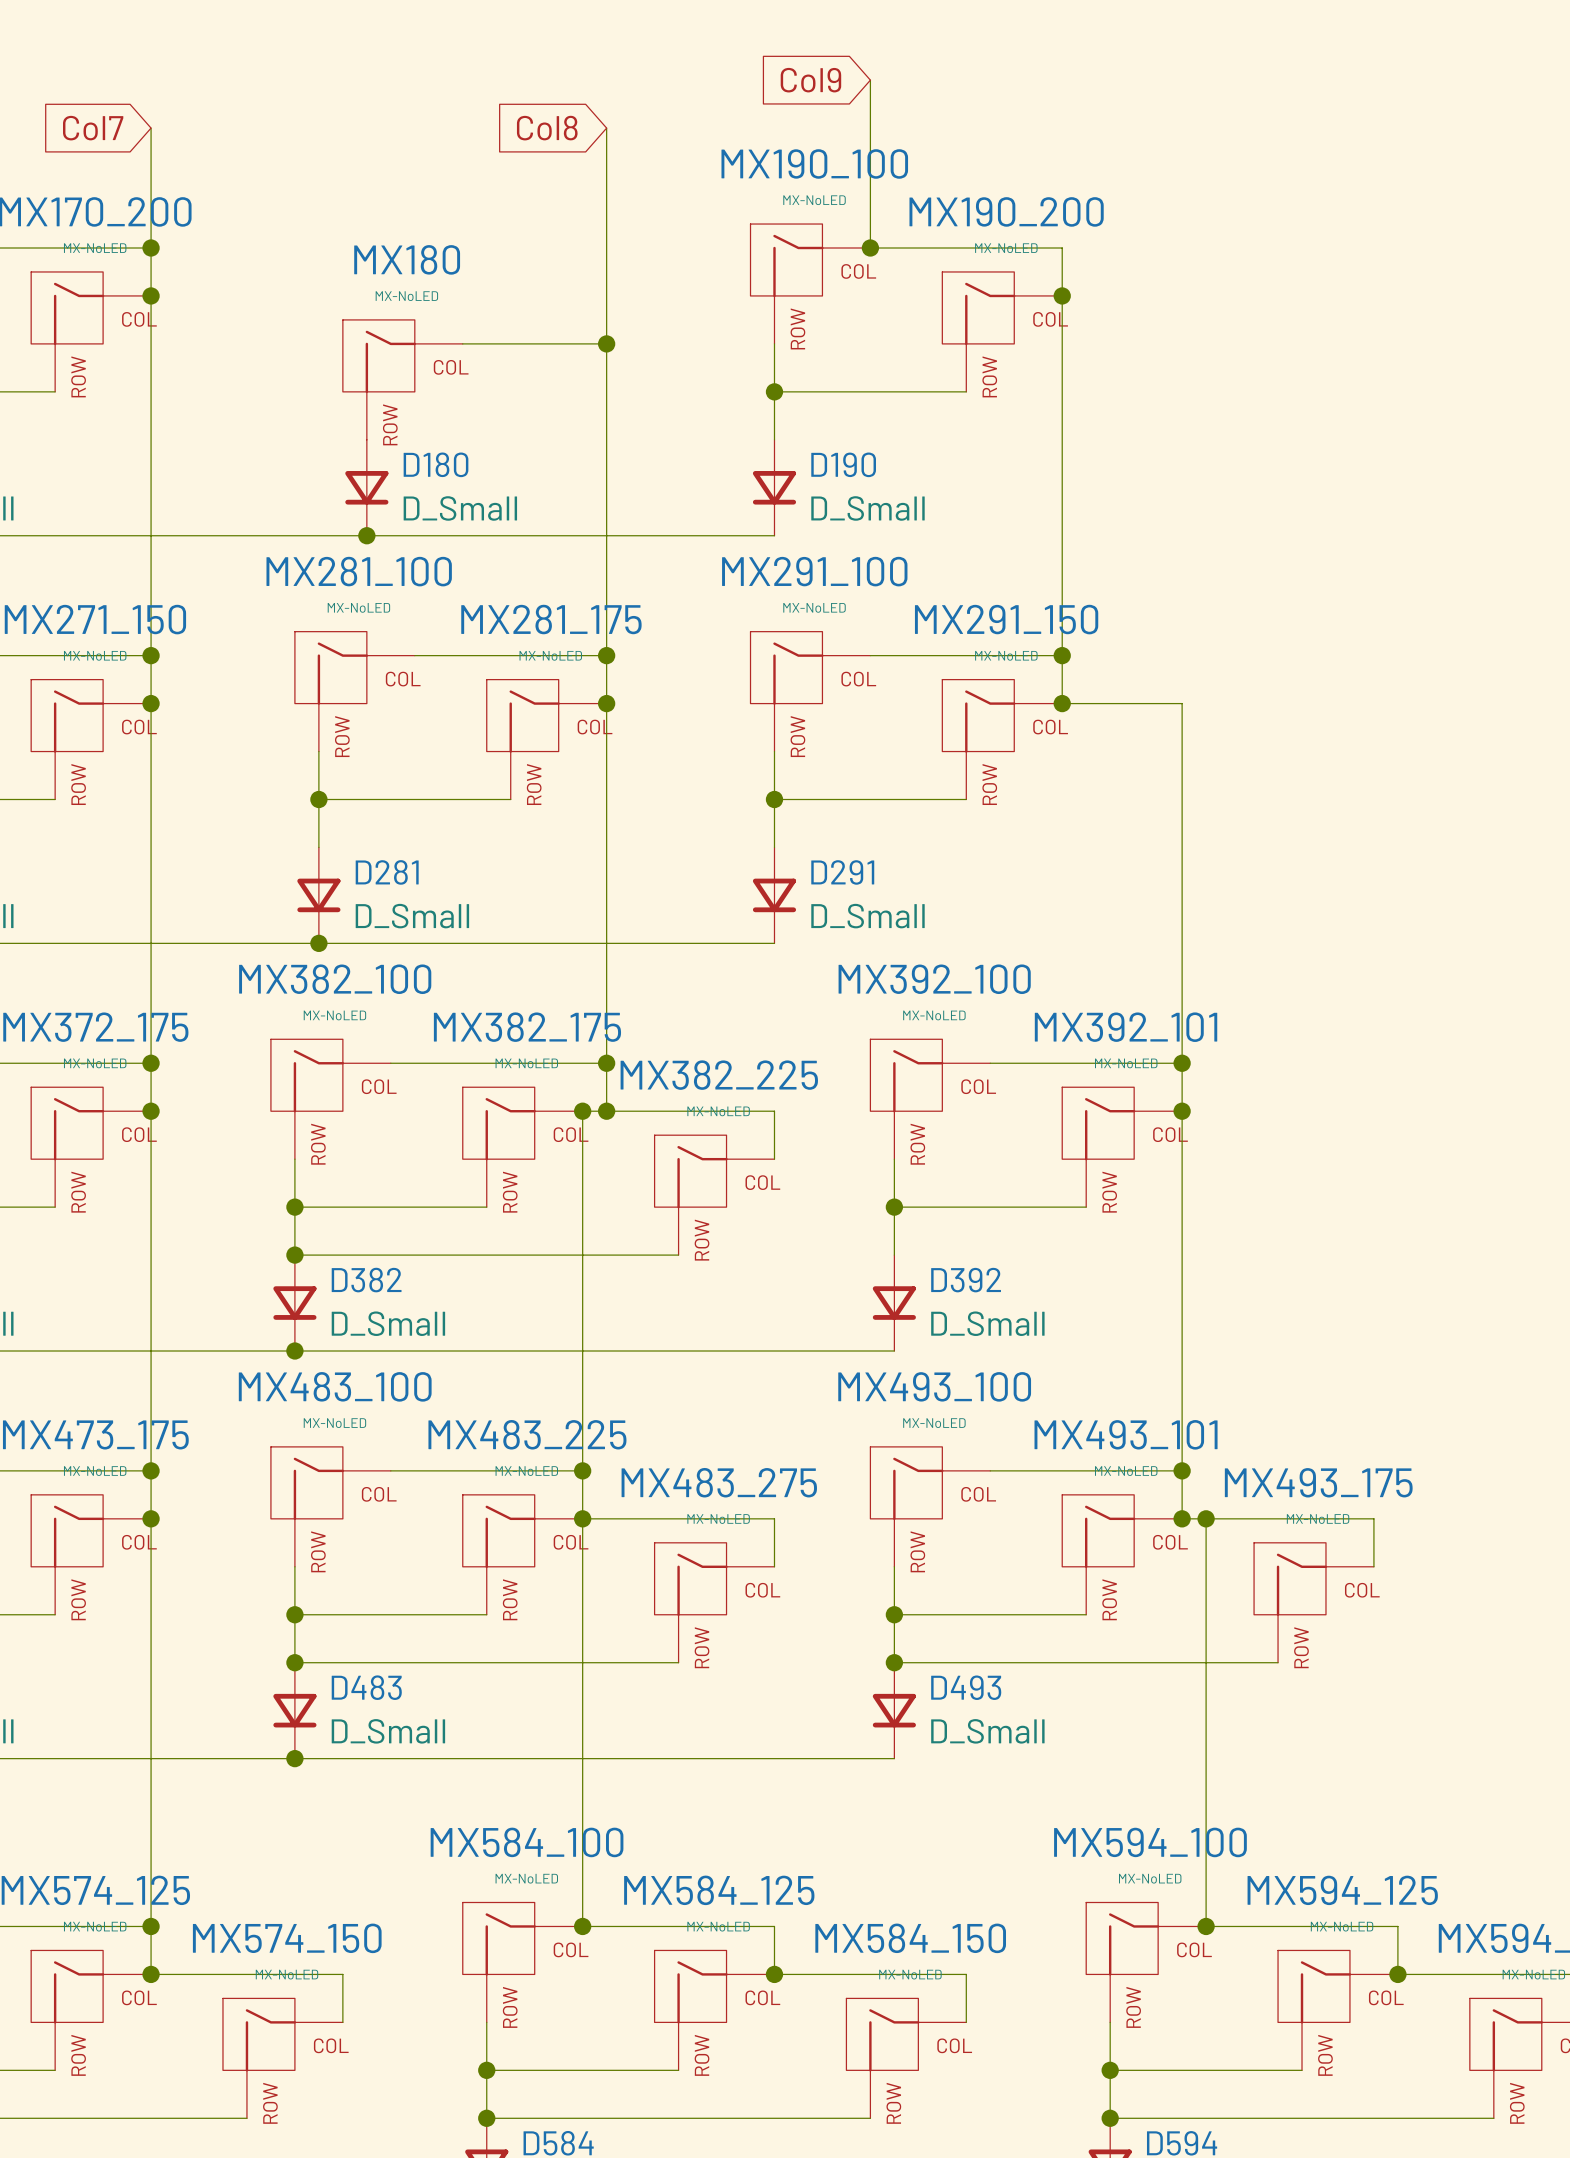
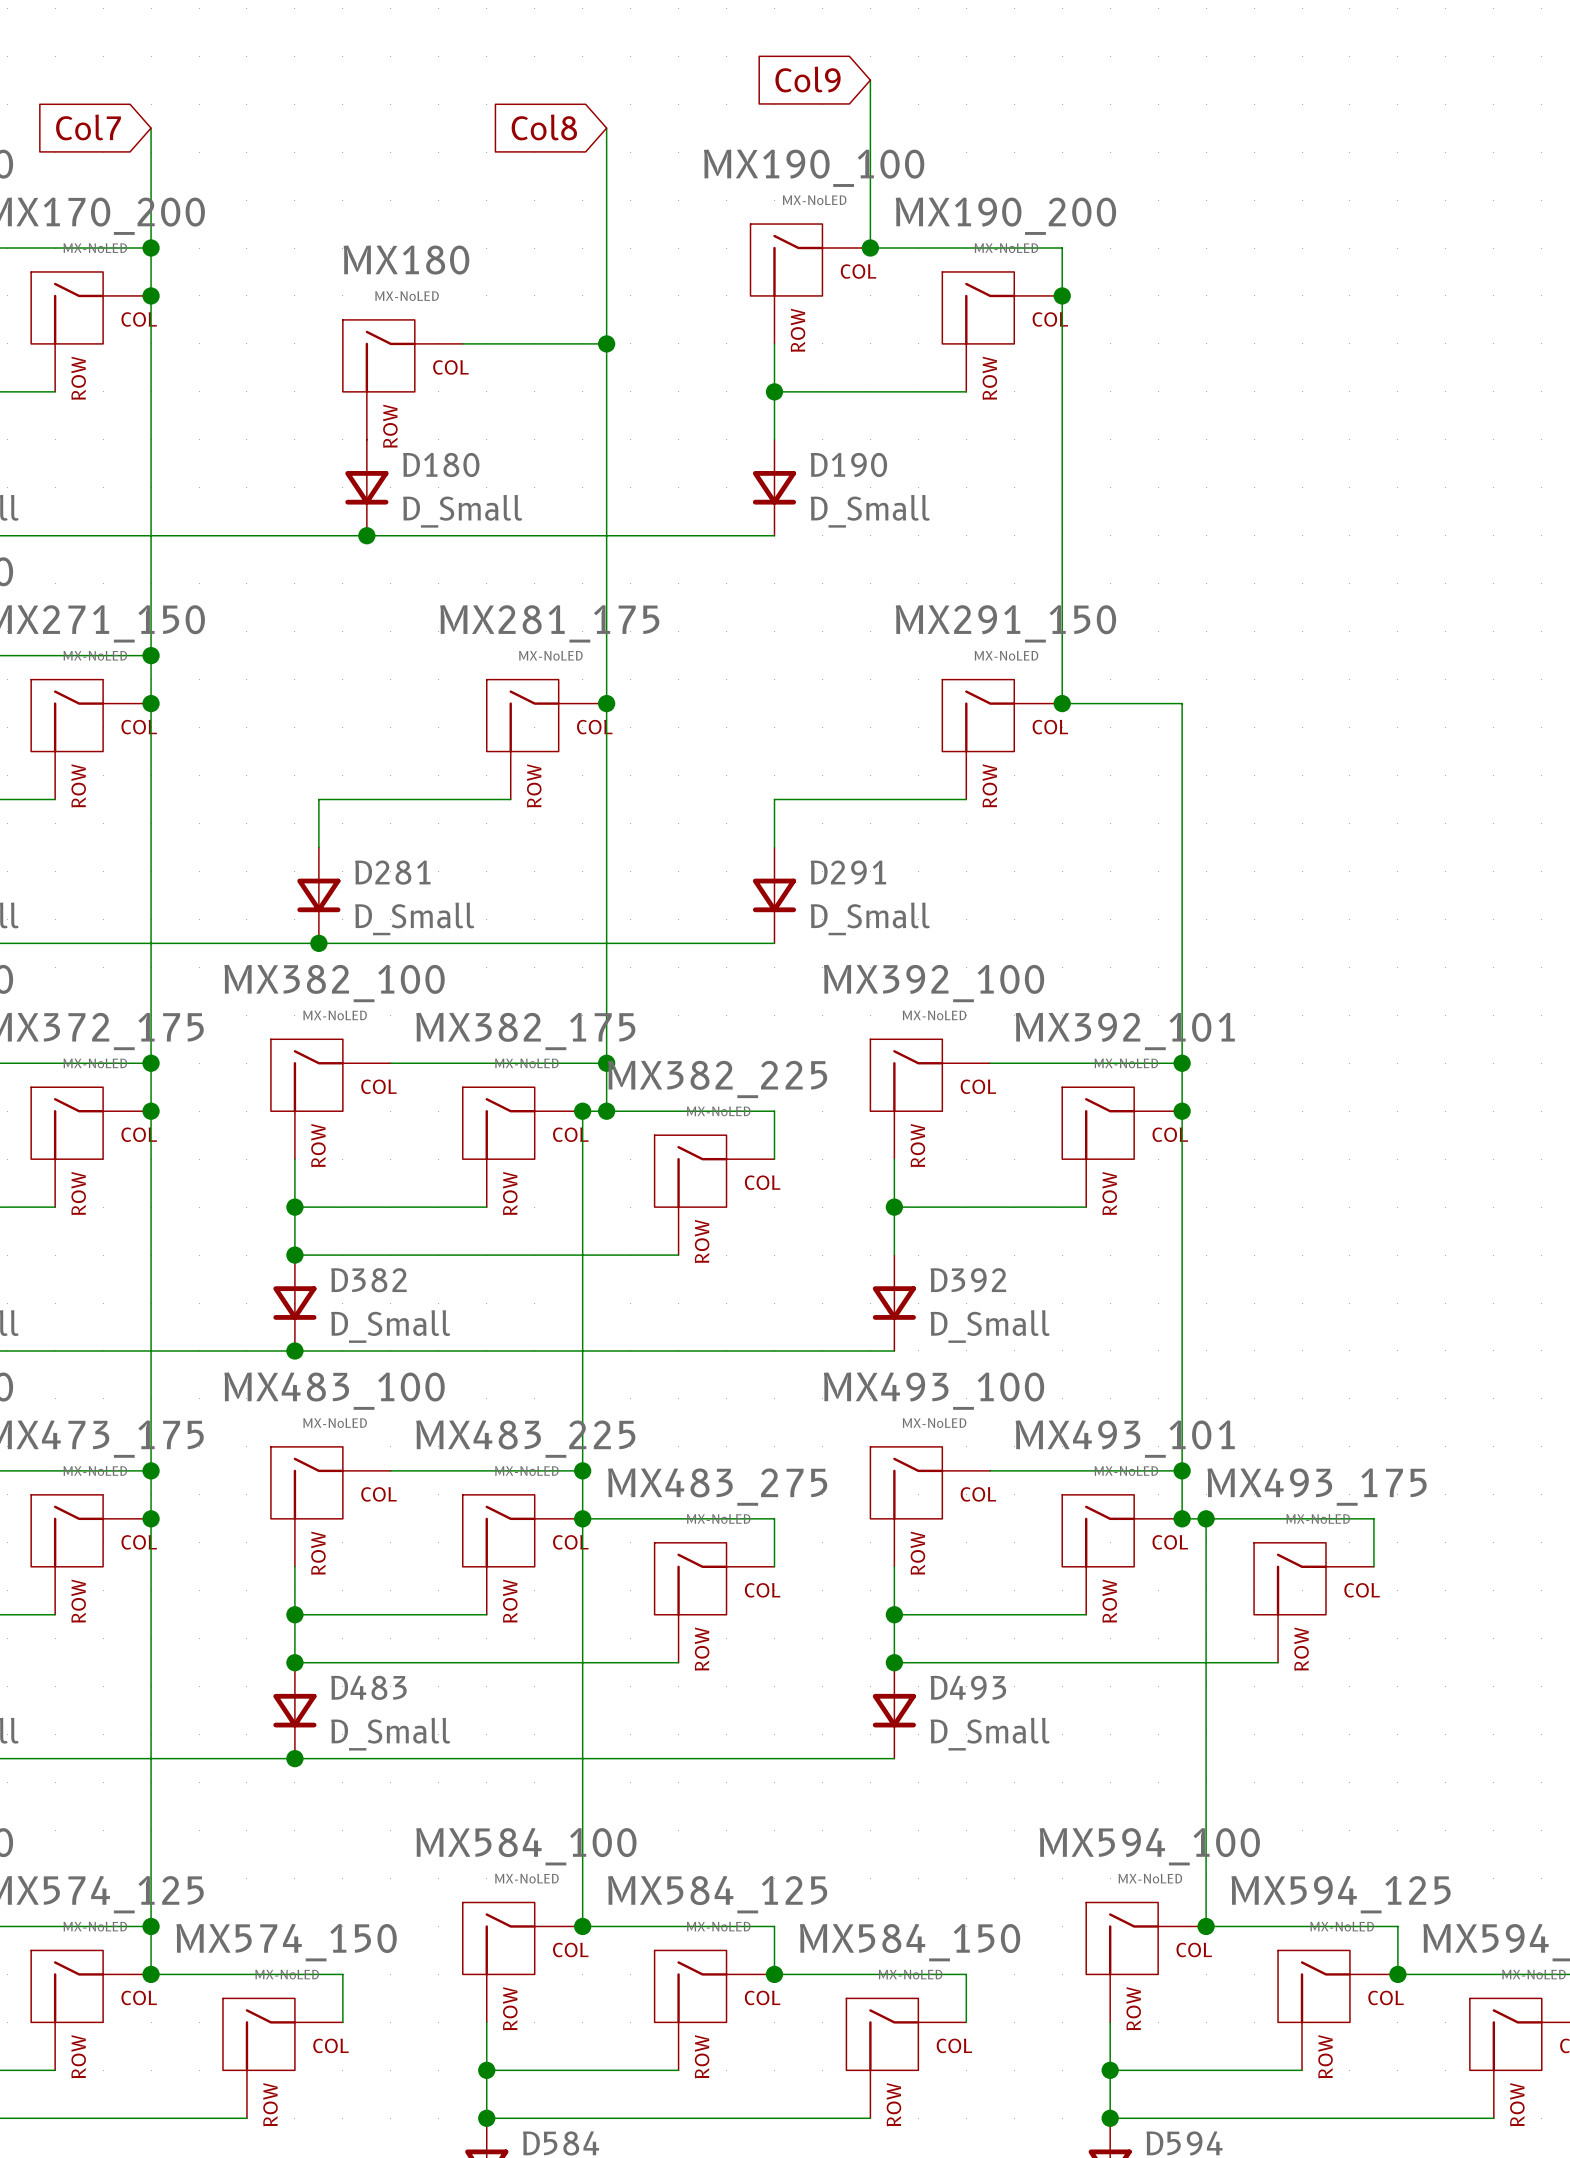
wire: (414, 655) (606, 655) -> none
junction: (606, 655) -> none
wire: (870, 655) (1062, 655) -> none
junction: (1062, 655) -> none
MX281_100: MX-NoLED (354, 691) -> none
MX291_100: MX-NoLED (810, 691) -> none
wire: (318, 751) (318, 799) -> none
wire: (774, 751) (774, 799) -> none
junction: (318, 799) -> none
junction: (774, 799) -> none

